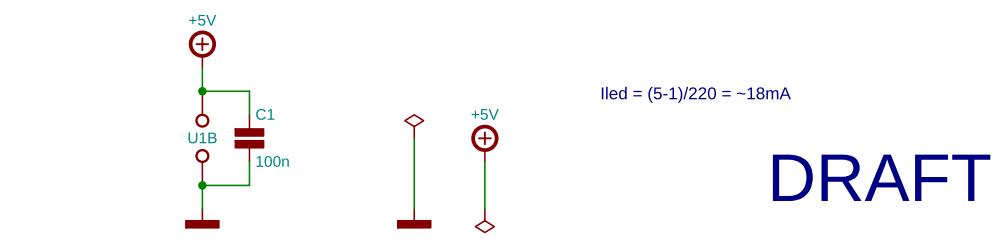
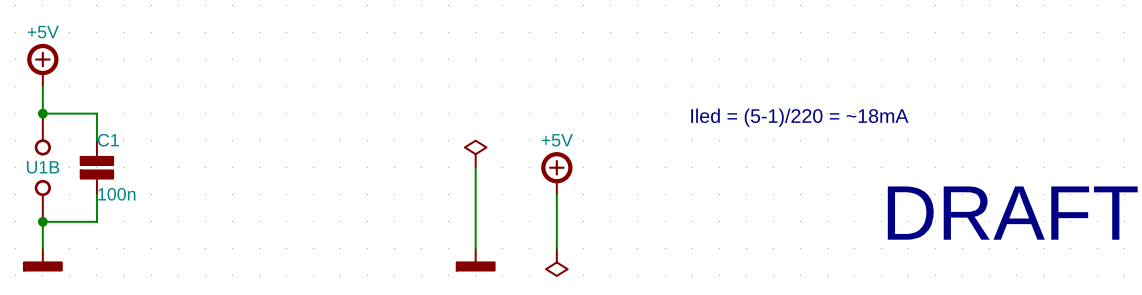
power symbol position: (202, 49) -> (42, 65)
wire: (202, 67) (202, 91) (249, 91) (249, 114) -> (42, 86) (42, 113) (96, 113) (96, 140)
junction: none -> (42, 113)
junction: (202, 91) -> none
C1 name position: C1 (265, 114) -> C1 (108, 140)
U1B position: (202, 138) -> (42, 167)
C1 position: (249, 138) -> (96, 167)
wire: (249, 161) (249, 185) (202, 185) (202, 208) -> (96, 194) (96, 221) (42, 221) (42, 248)
C1 value position: 100n (272, 161) -> 100n (116, 194)
junction: none -> (42, 221)
junction: (202, 185) -> none
power symbol position: (202, 218) -> (42, 259)

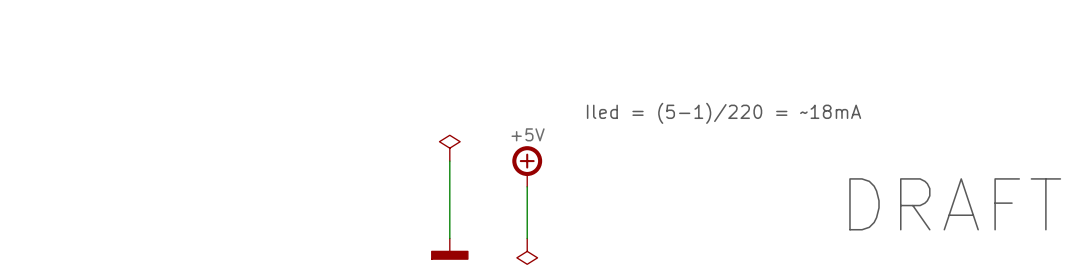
power symbol: (42, 65) -> none
wire: (42, 86) (42, 113) (96, 113) (96, 140) -> none
junction: (42, 113) -> none
U1B: (42, 167) -> none
C1: 100n (96, 167) -> none
wire: (96, 194) (96, 221) (42, 221) (42, 248) -> none
junction: (42, 221) -> none
power symbol: (42, 259) -> none

